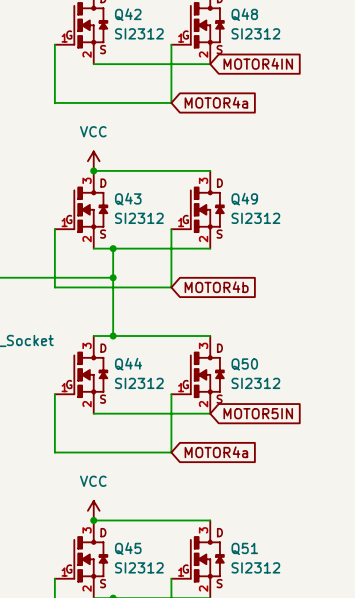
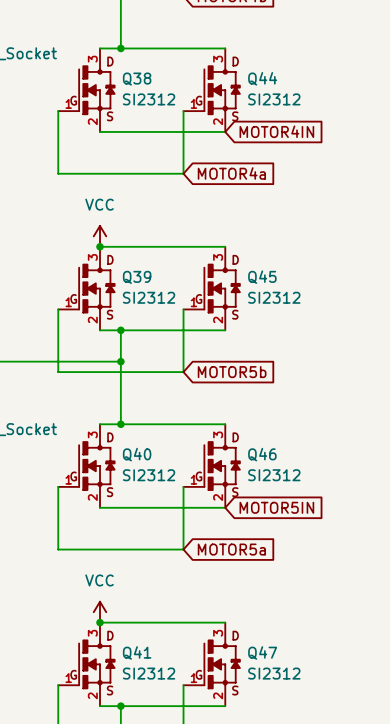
Q42 name: Q42 (128, 14) -> Q38 (137, 79)
Q48 name: Q48 (244, 14) -> Q44 (262, 78)
Q43 name: Q43 (128, 199) -> Q39 (137, 277)
Q49 name: Q49 (244, 199) -> Q45 (262, 277)
global label: MOTOR4b (216, 287) -> MOTOR5b (232, 372)
Q44 name: Q44 (128, 364) -> Q40 (137, 454)
Q50 name: Q50 (244, 364) -> Q46 (262, 454)
global label: MOTOR4a (216, 452) -> MOTOR5a (231, 549)
Q45 name: Q45 (128, 548) -> Q41 (137, 652)
Q51 name: Q51 (244, 548) -> Q47 (262, 652)

